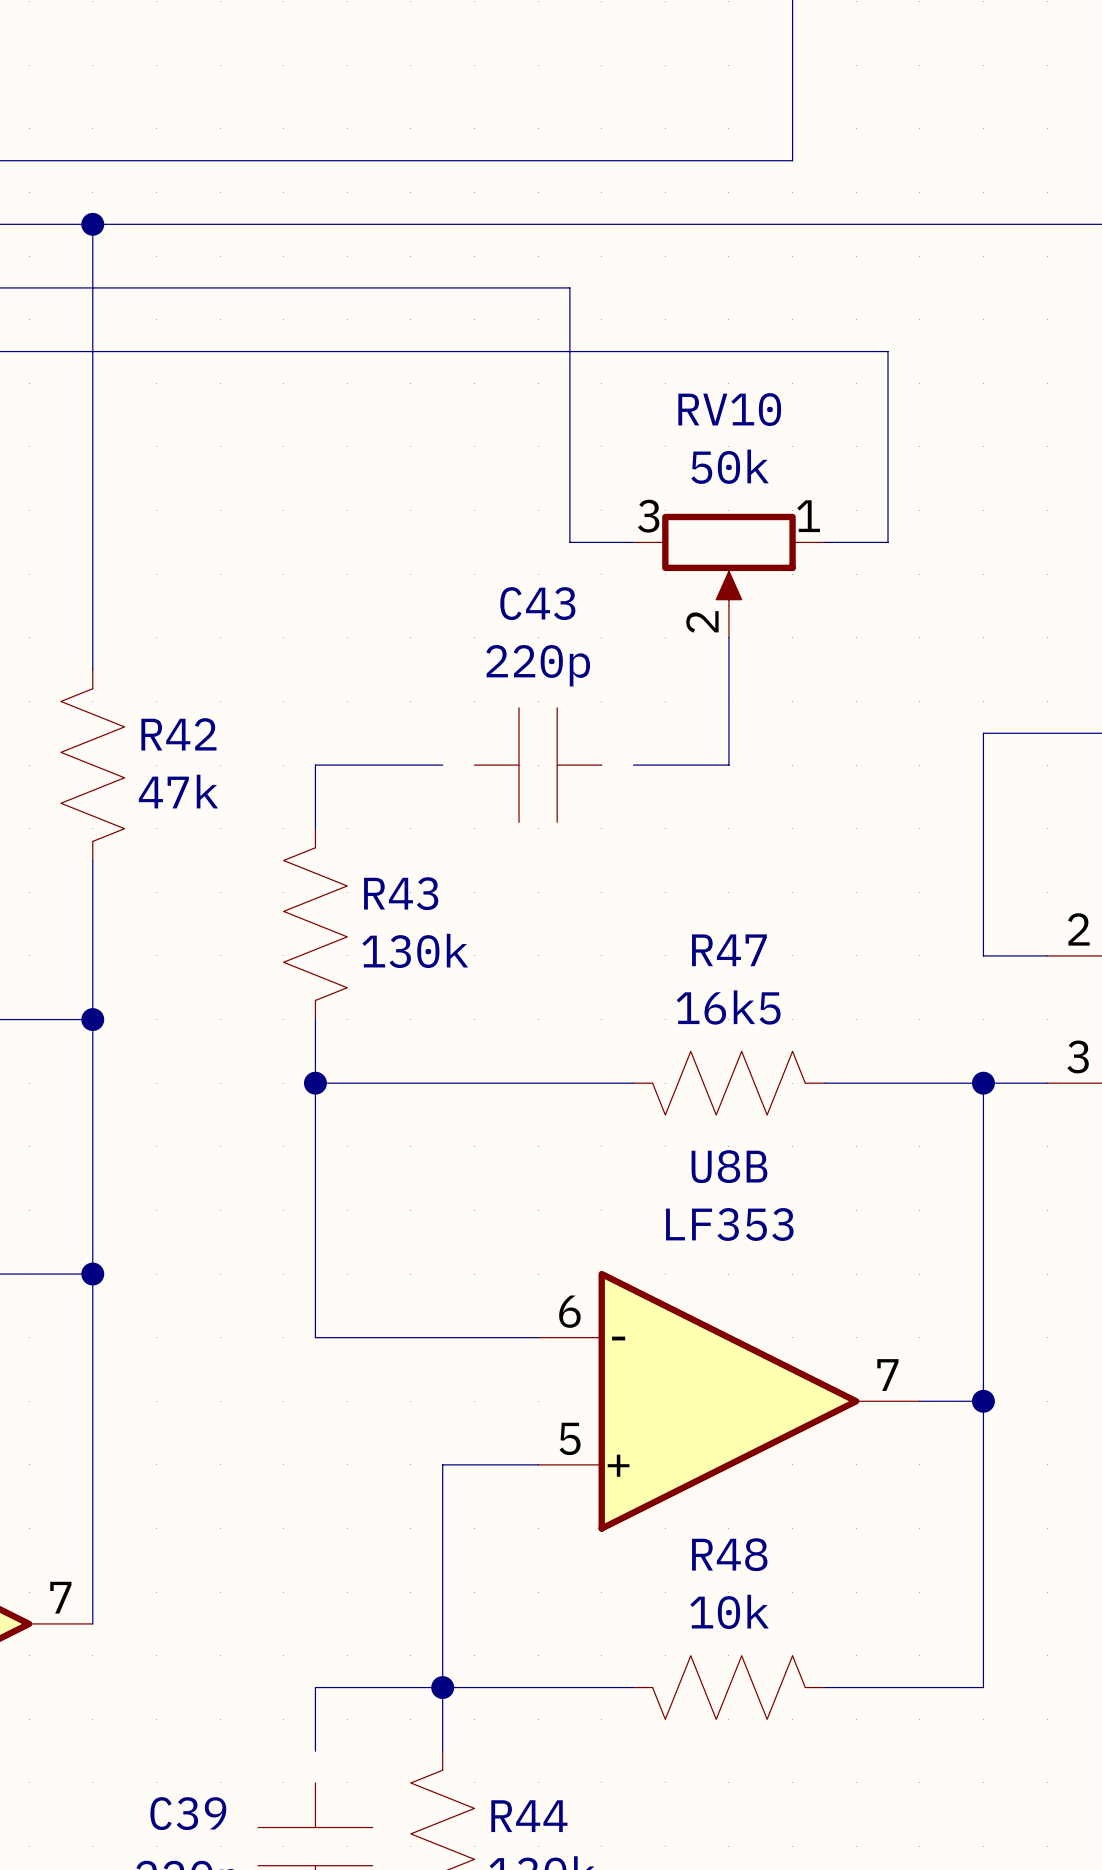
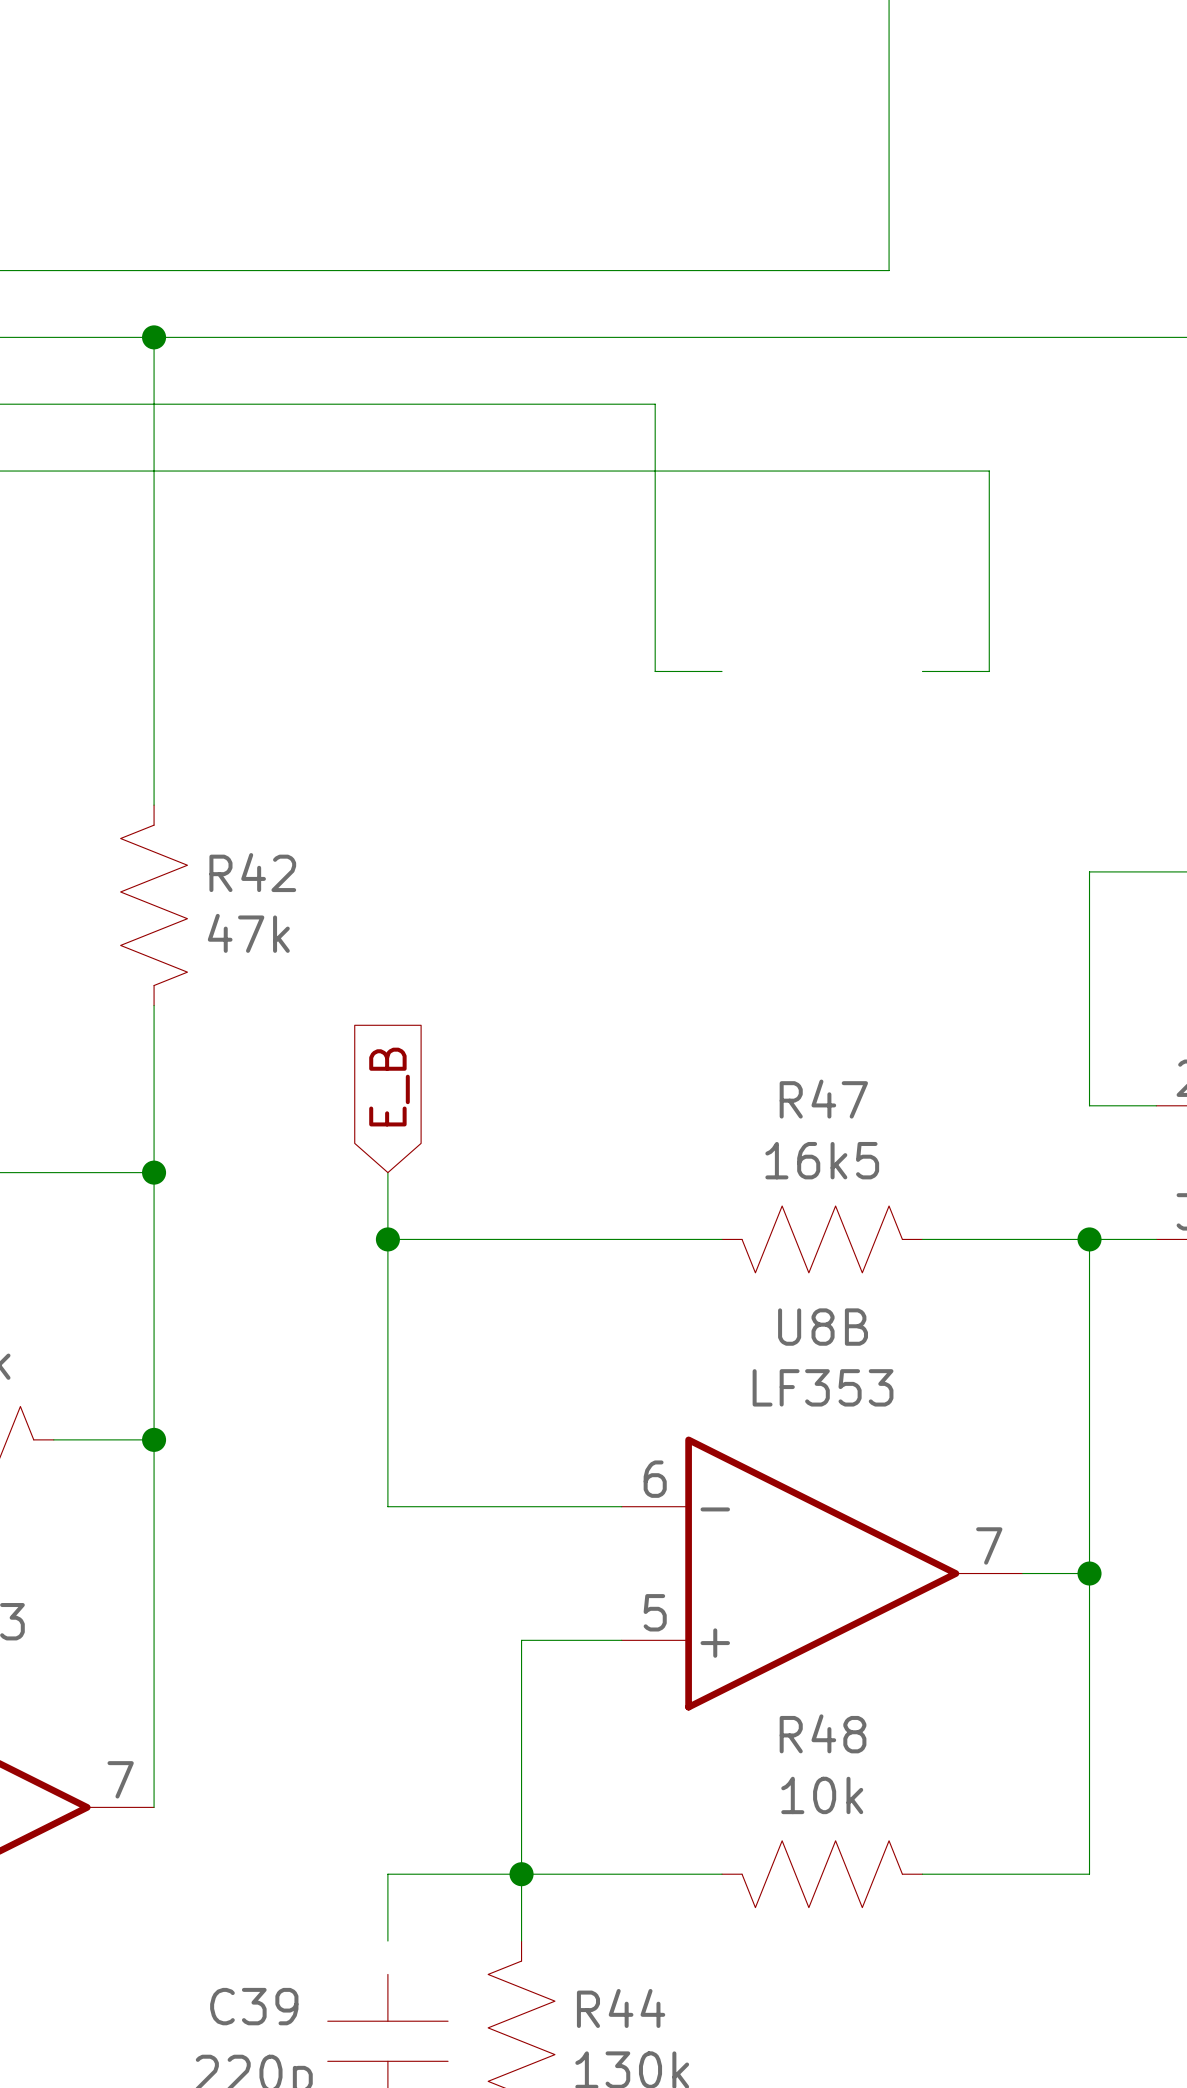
RV10: 50k (728, 575) -> none
wire: (728, 637) (728, 765) (633, 765) -> none
wire: (442, 765) (315, 765) (315, 828) -> none
C43: 220p (538, 765) -> none
R43: 130k (315, 924) -> none
global label: none -> E_B (389, 1087)

